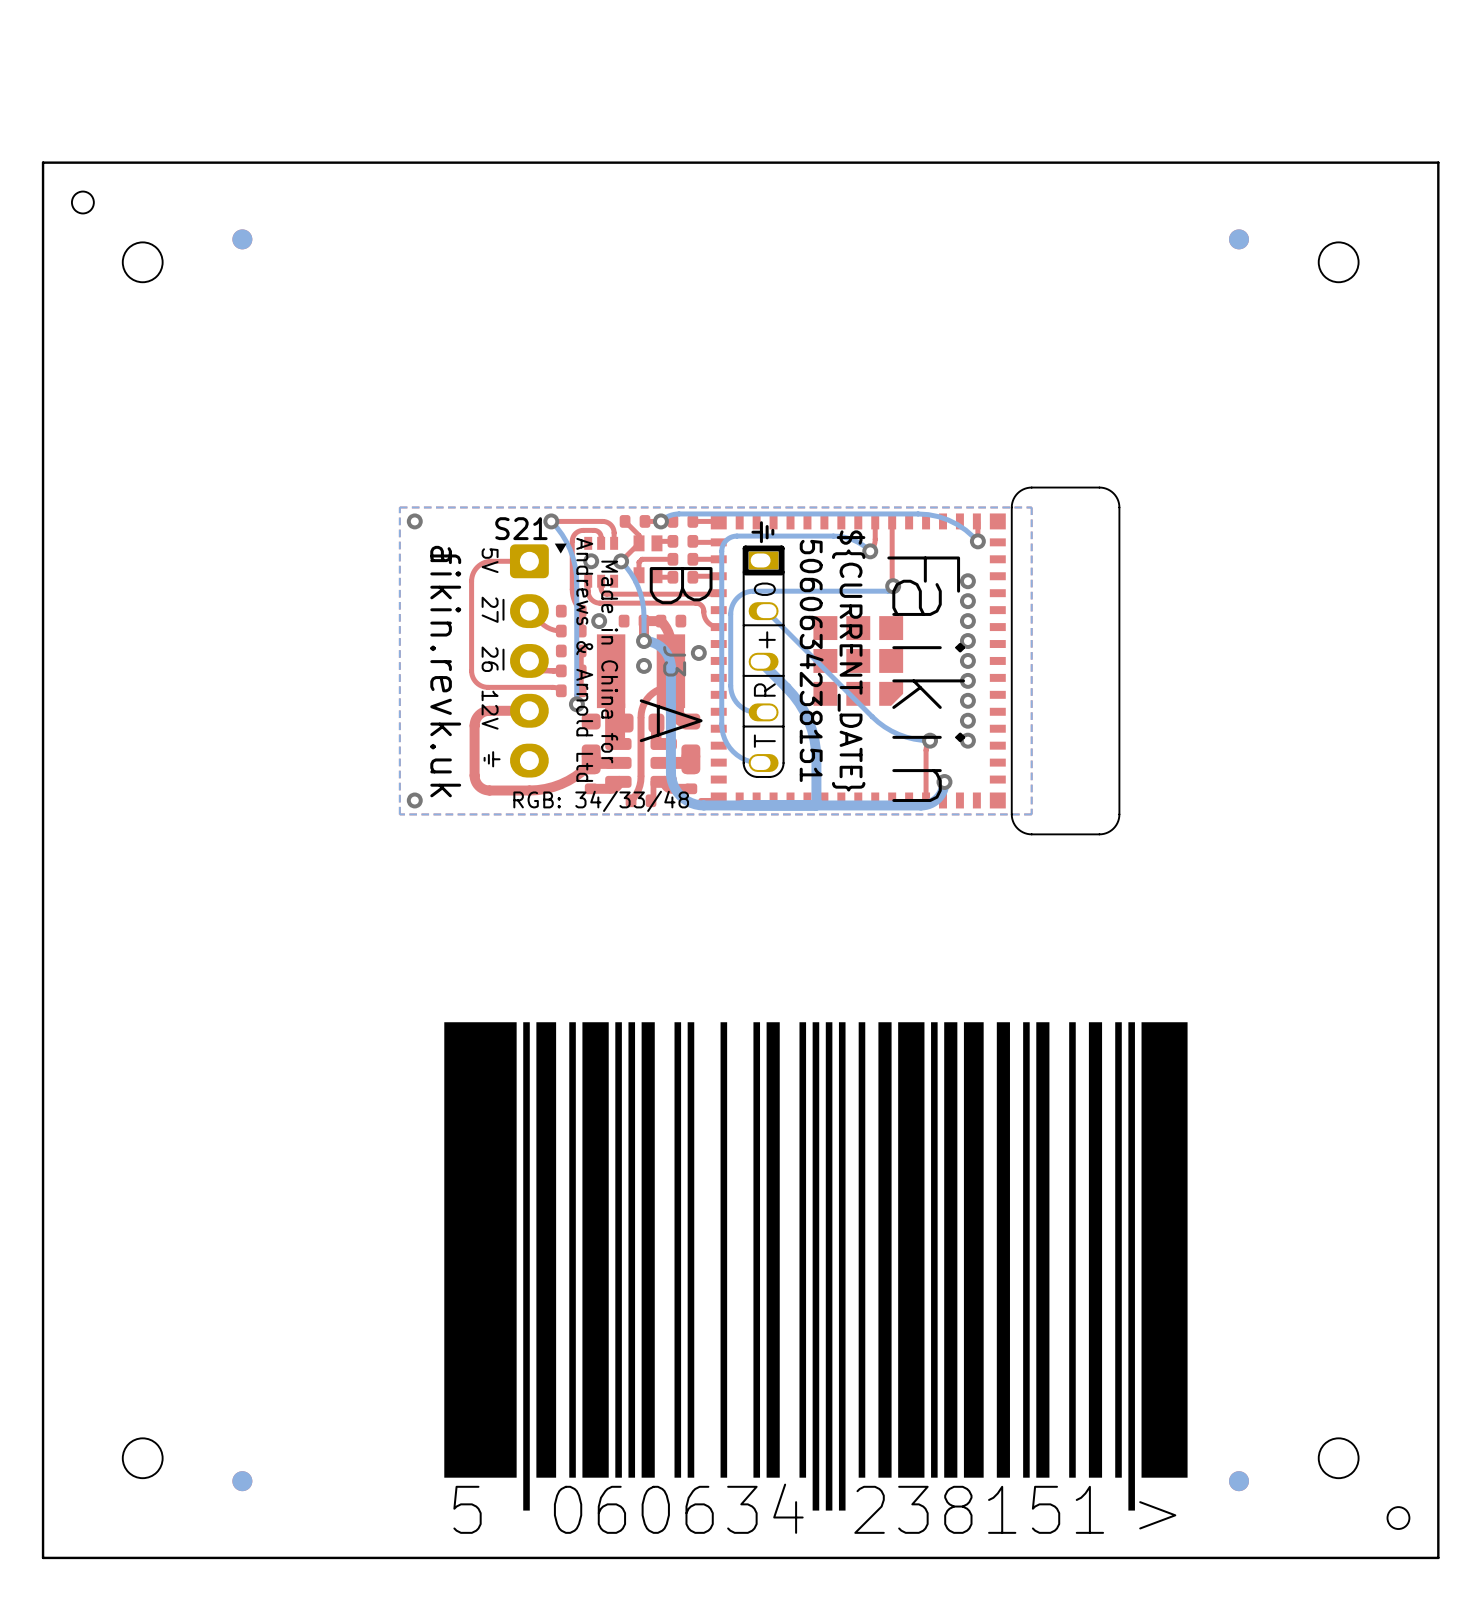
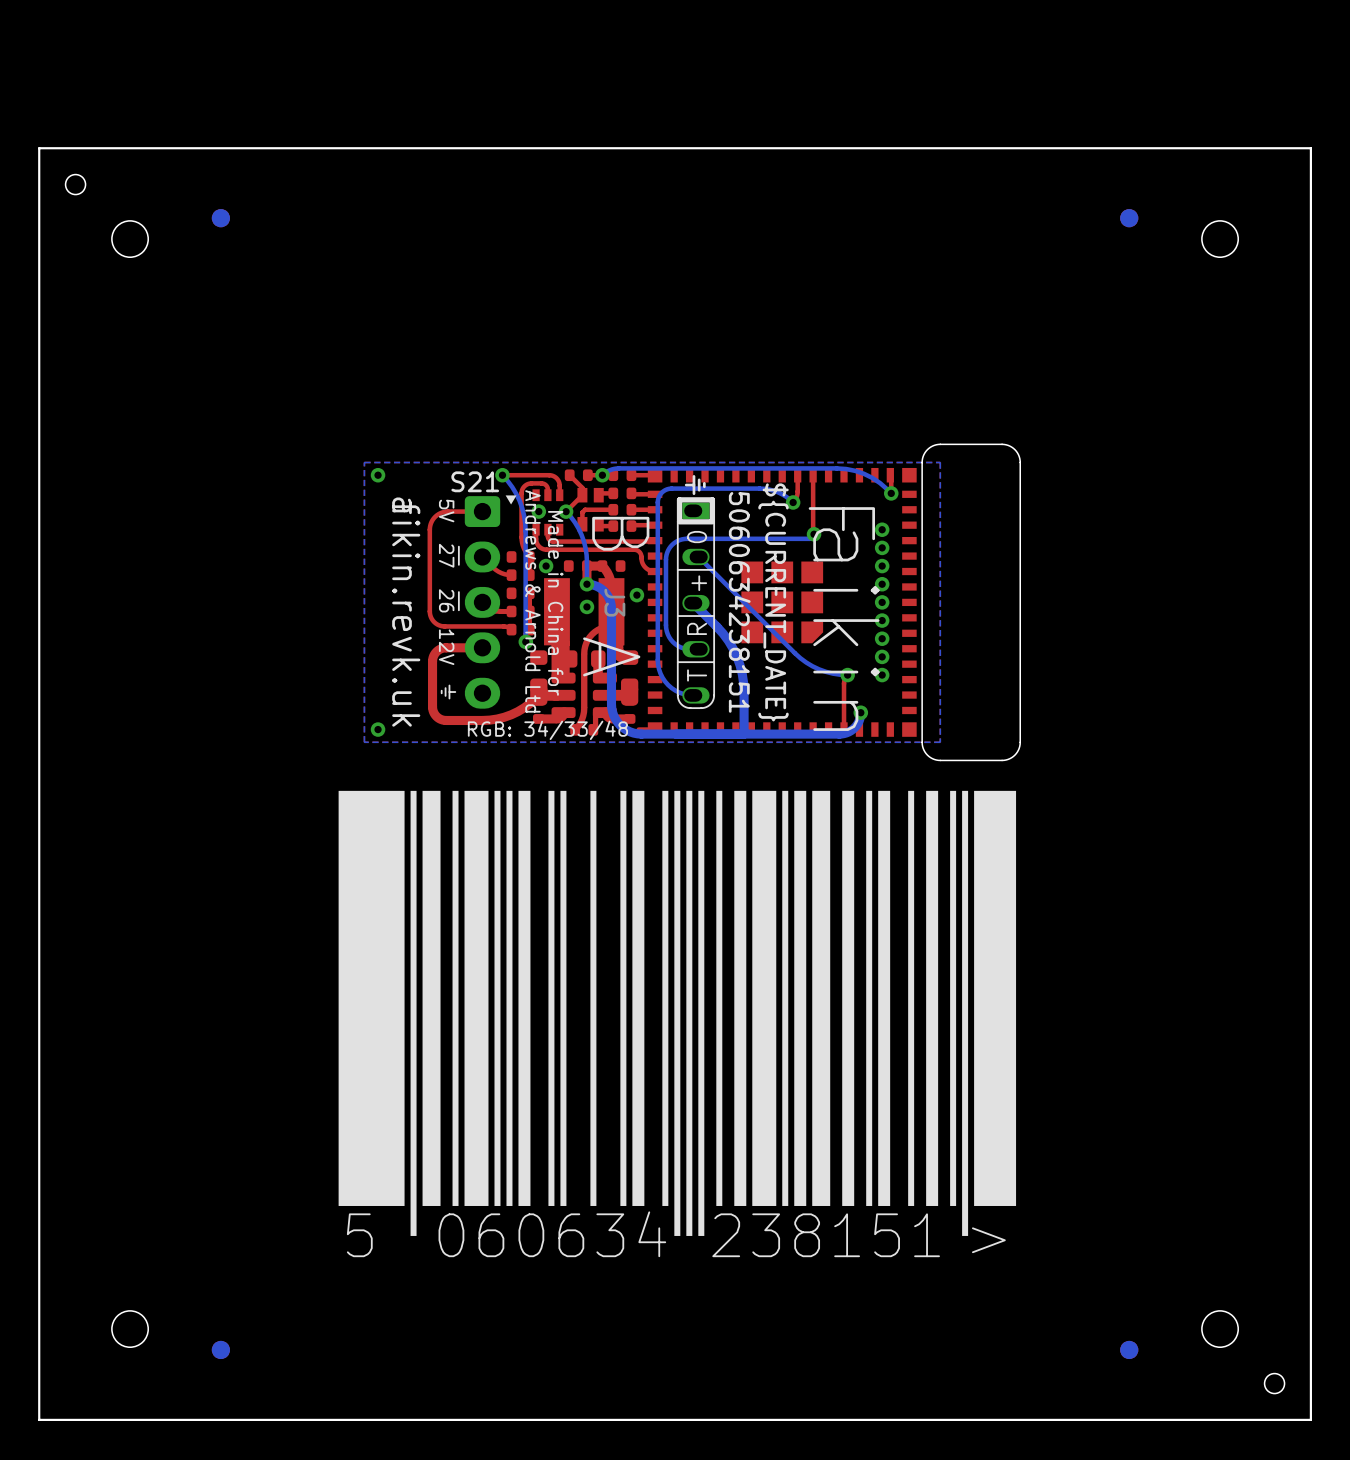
drawing position: (815, 1266) -> (677, 1013)

